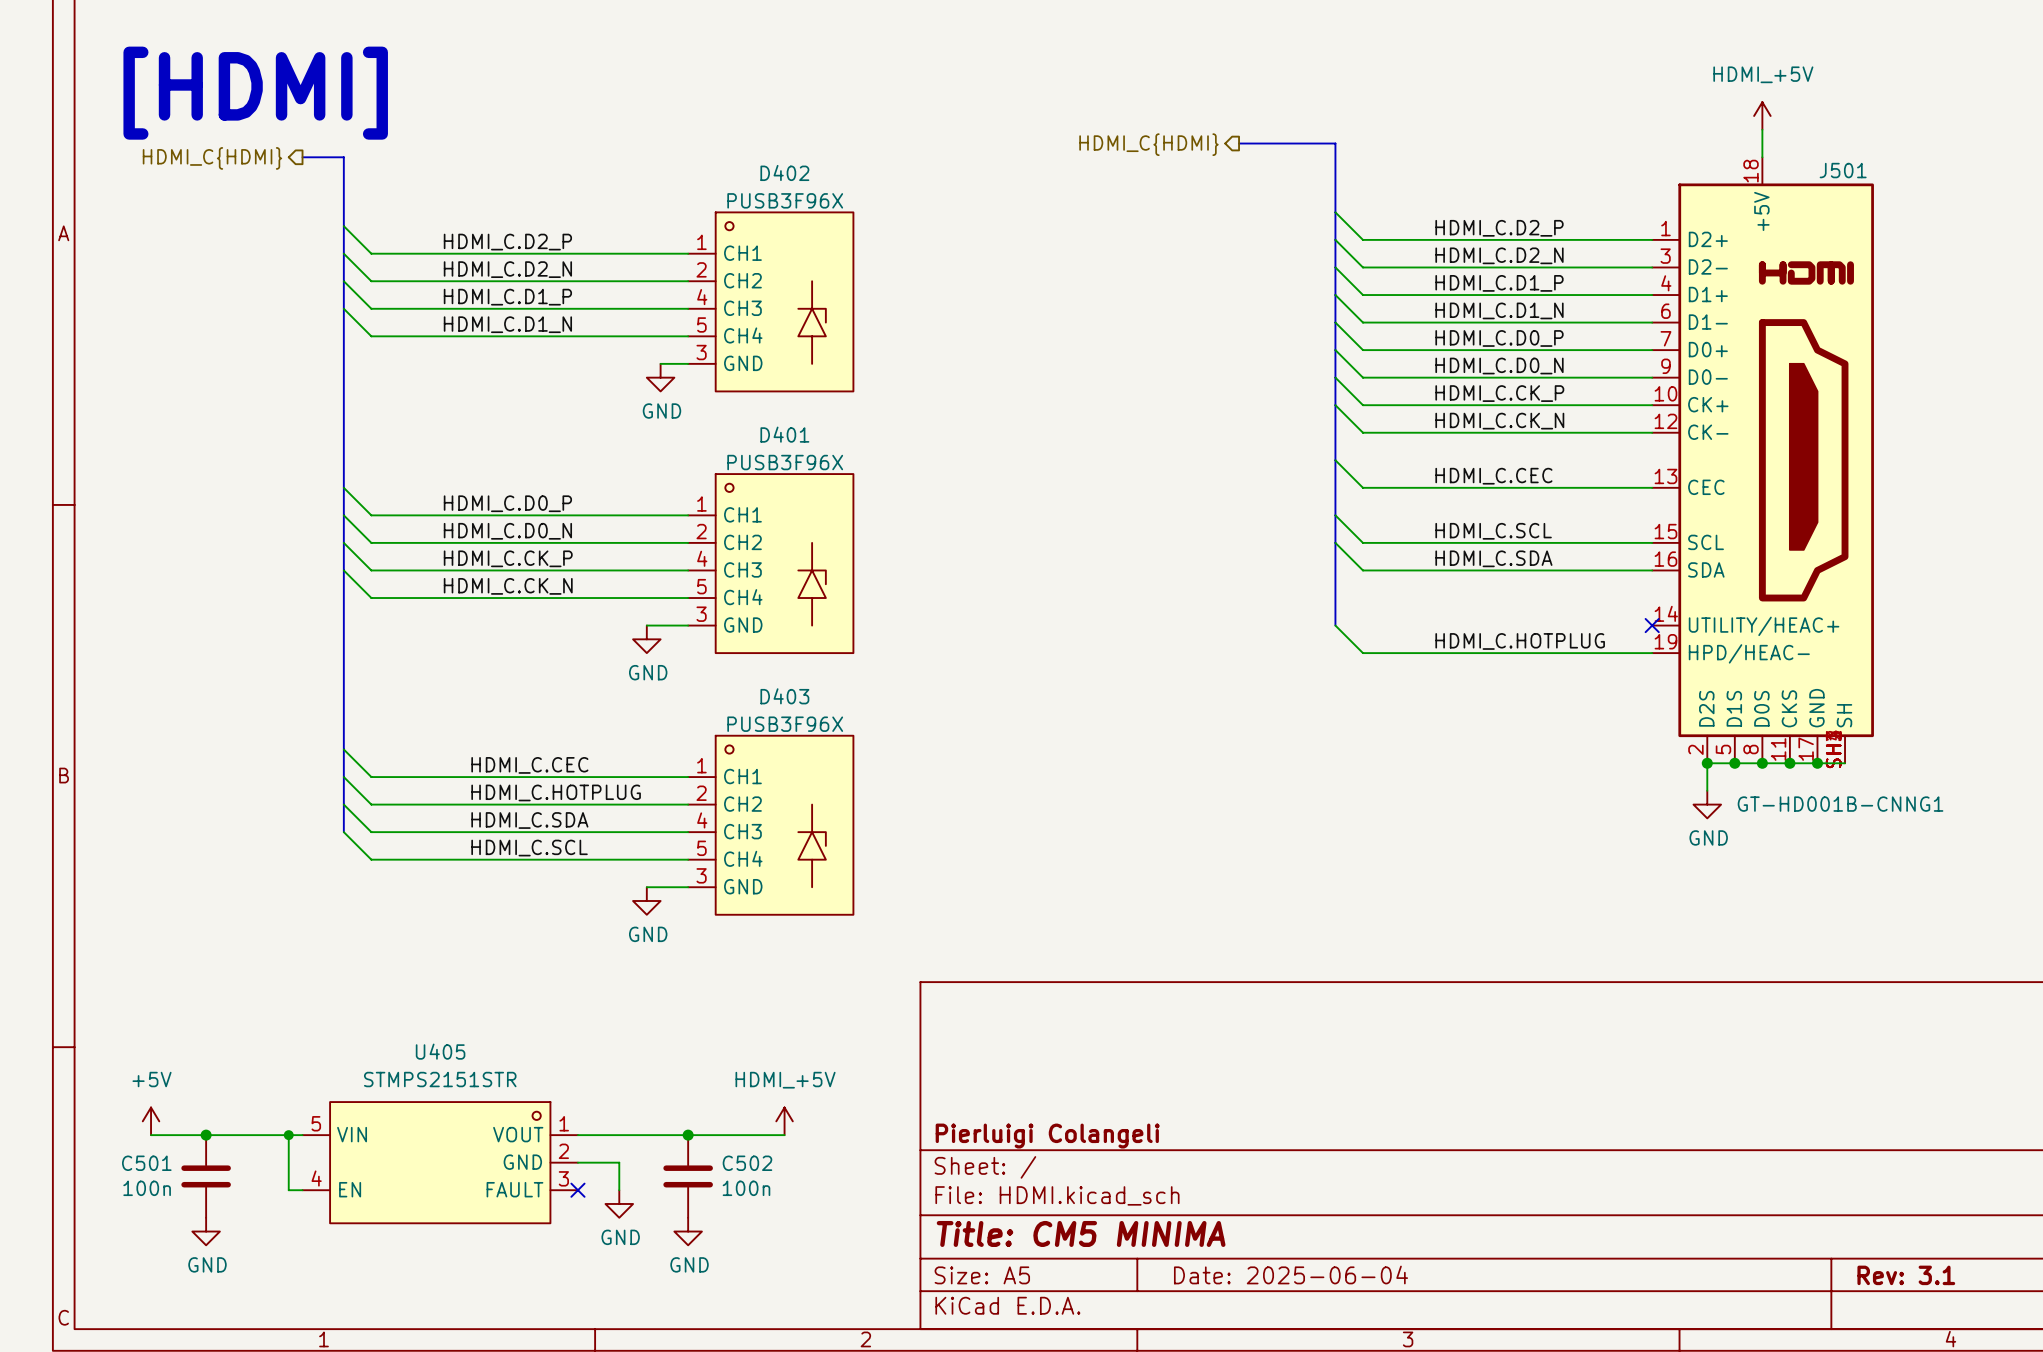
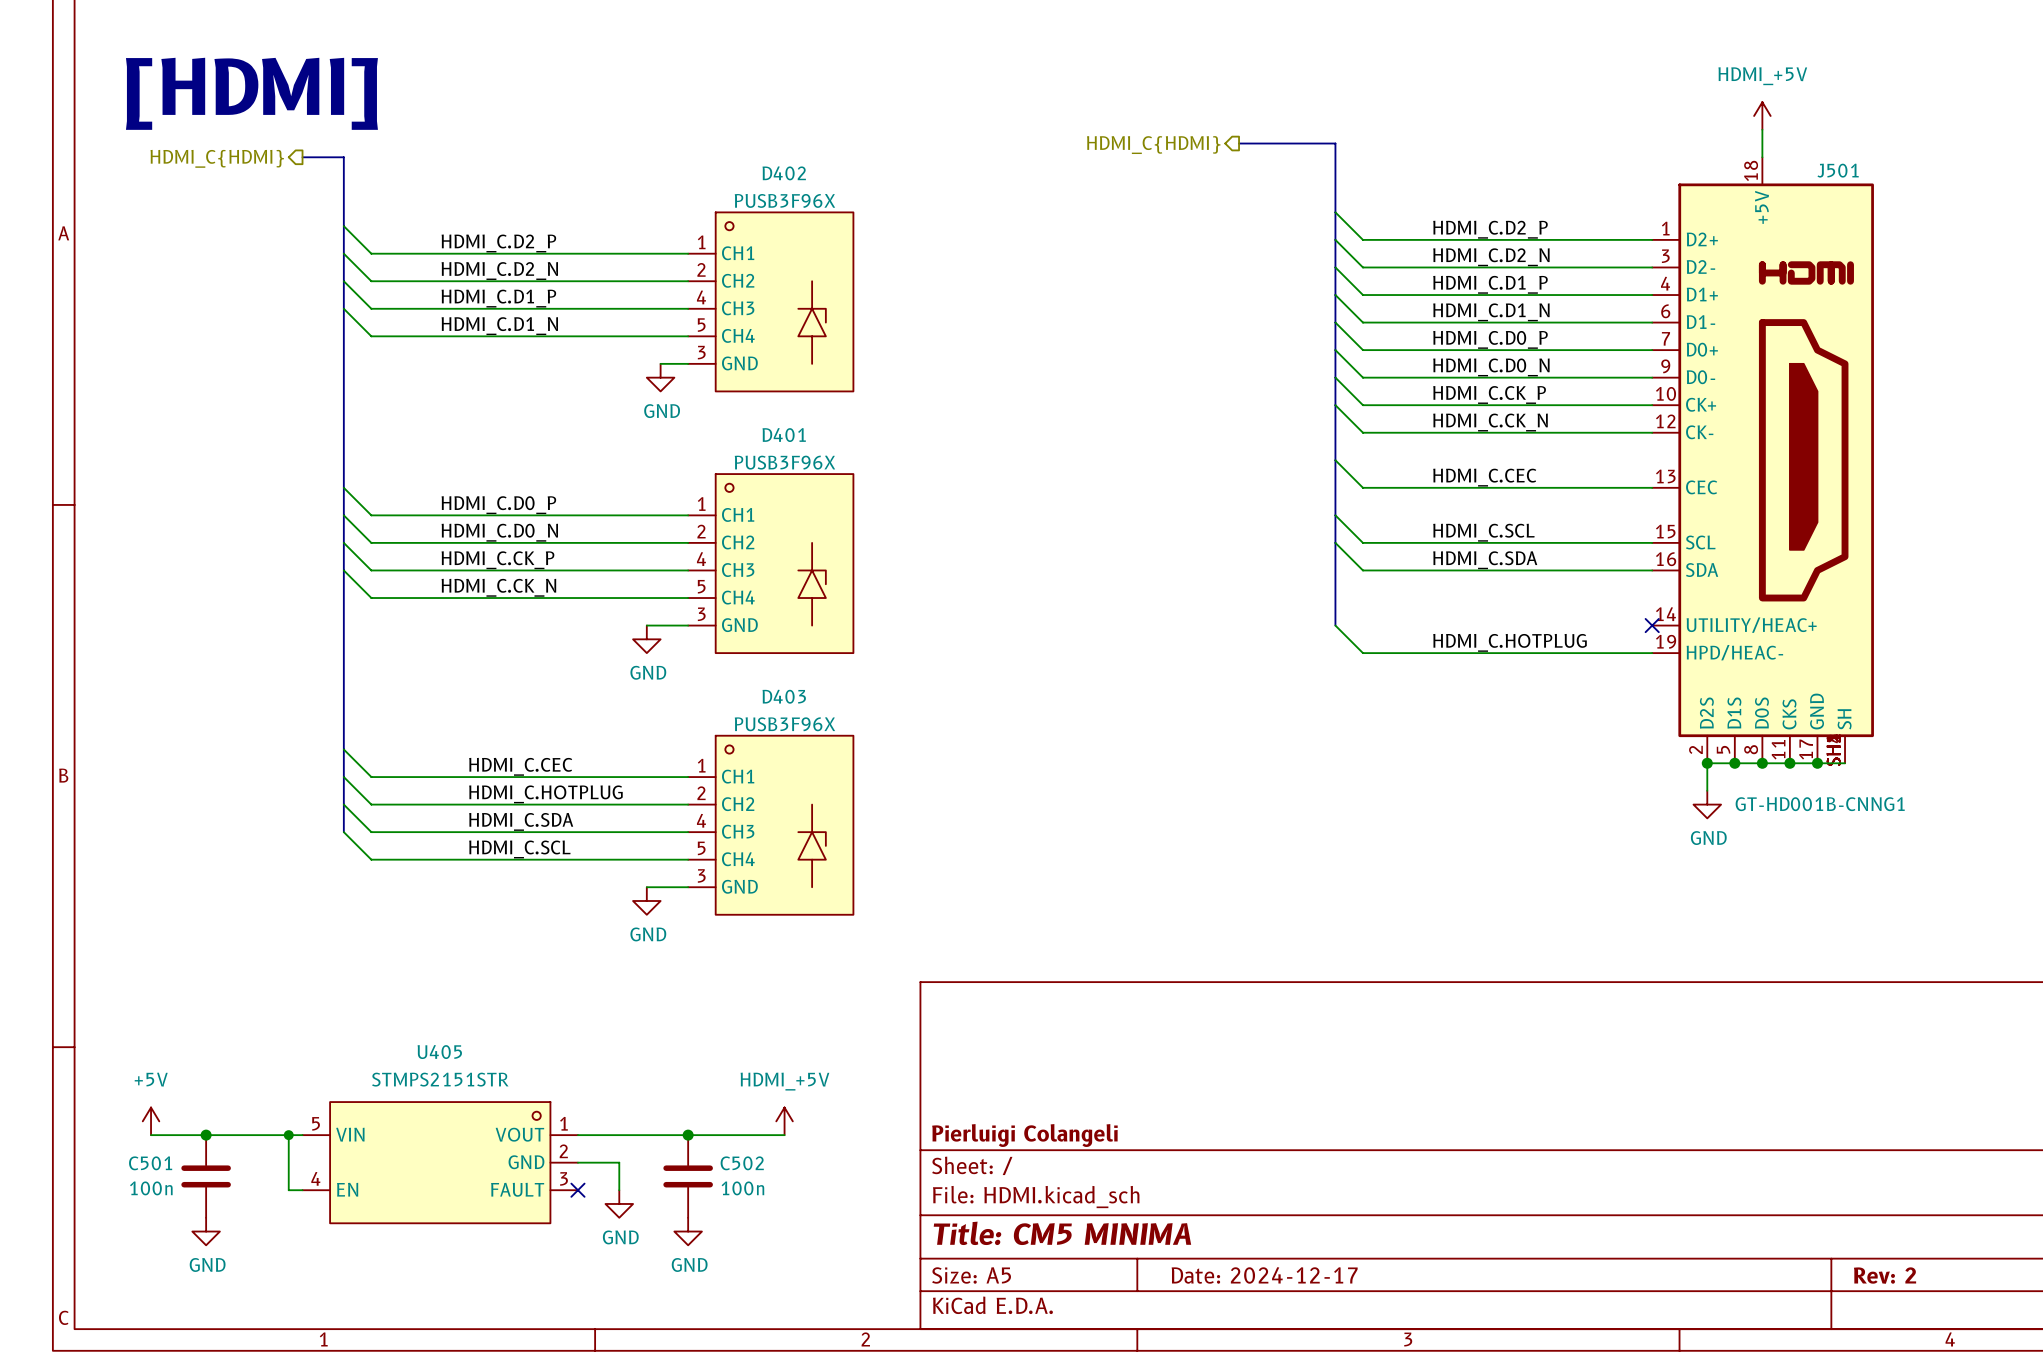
title block: Date: 2025-06-04 (1291, 1275) -> Date: 2024-12-17 (1264, 1275)
title block: Rev: 3.1 (1906, 1275) -> Rev: 2 (1885, 1275)

